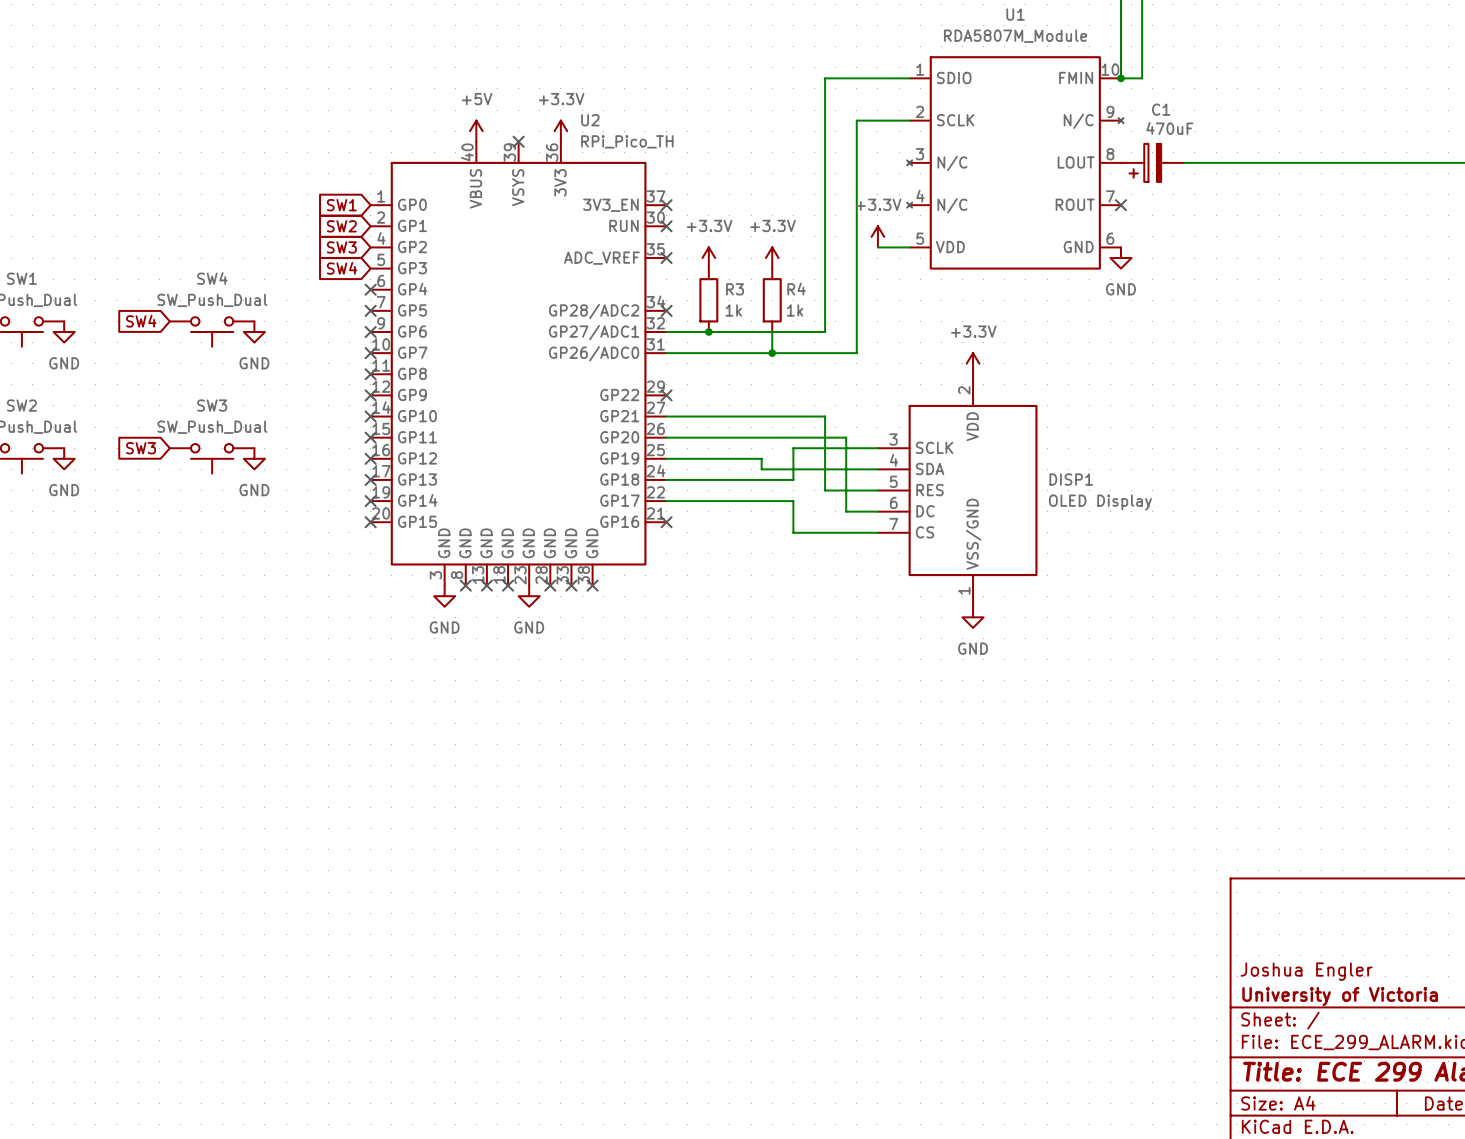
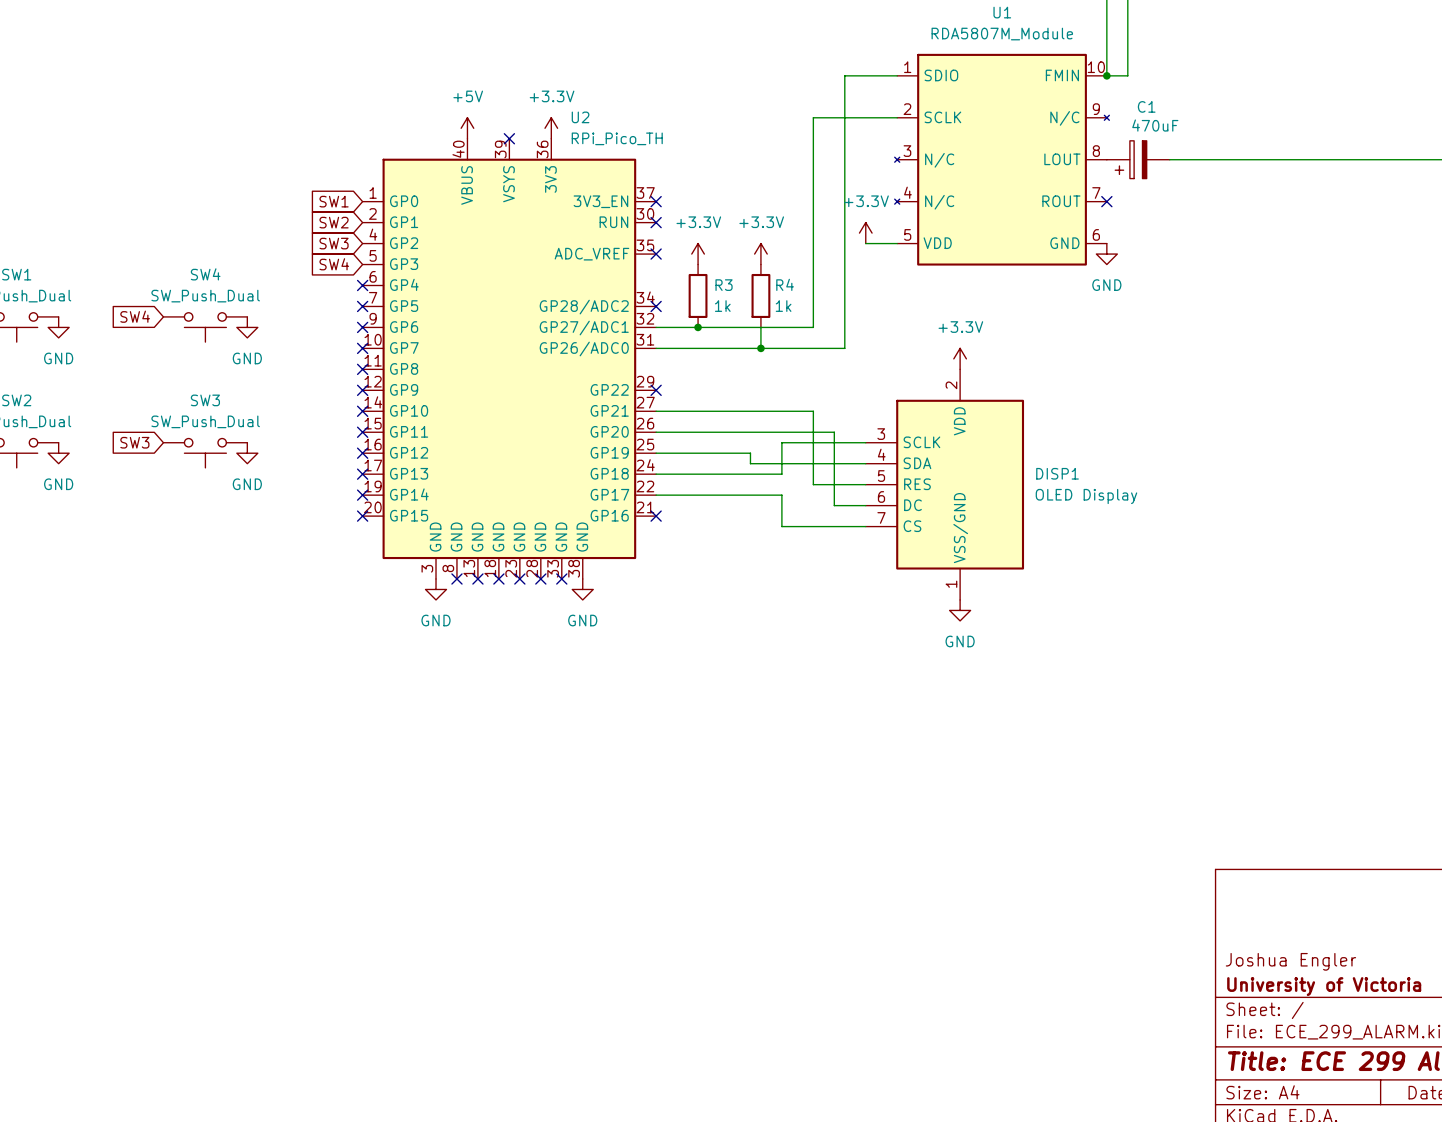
wire: (856, 78) (825, 78) (825, 120) -> (844, 75) (844, 117) (813, 117)
no-connect mark: none -> (519, 578)
no-connect mark: (592, 585) -> none
power symbol position: GND (529, 596) -> GND (582, 589)

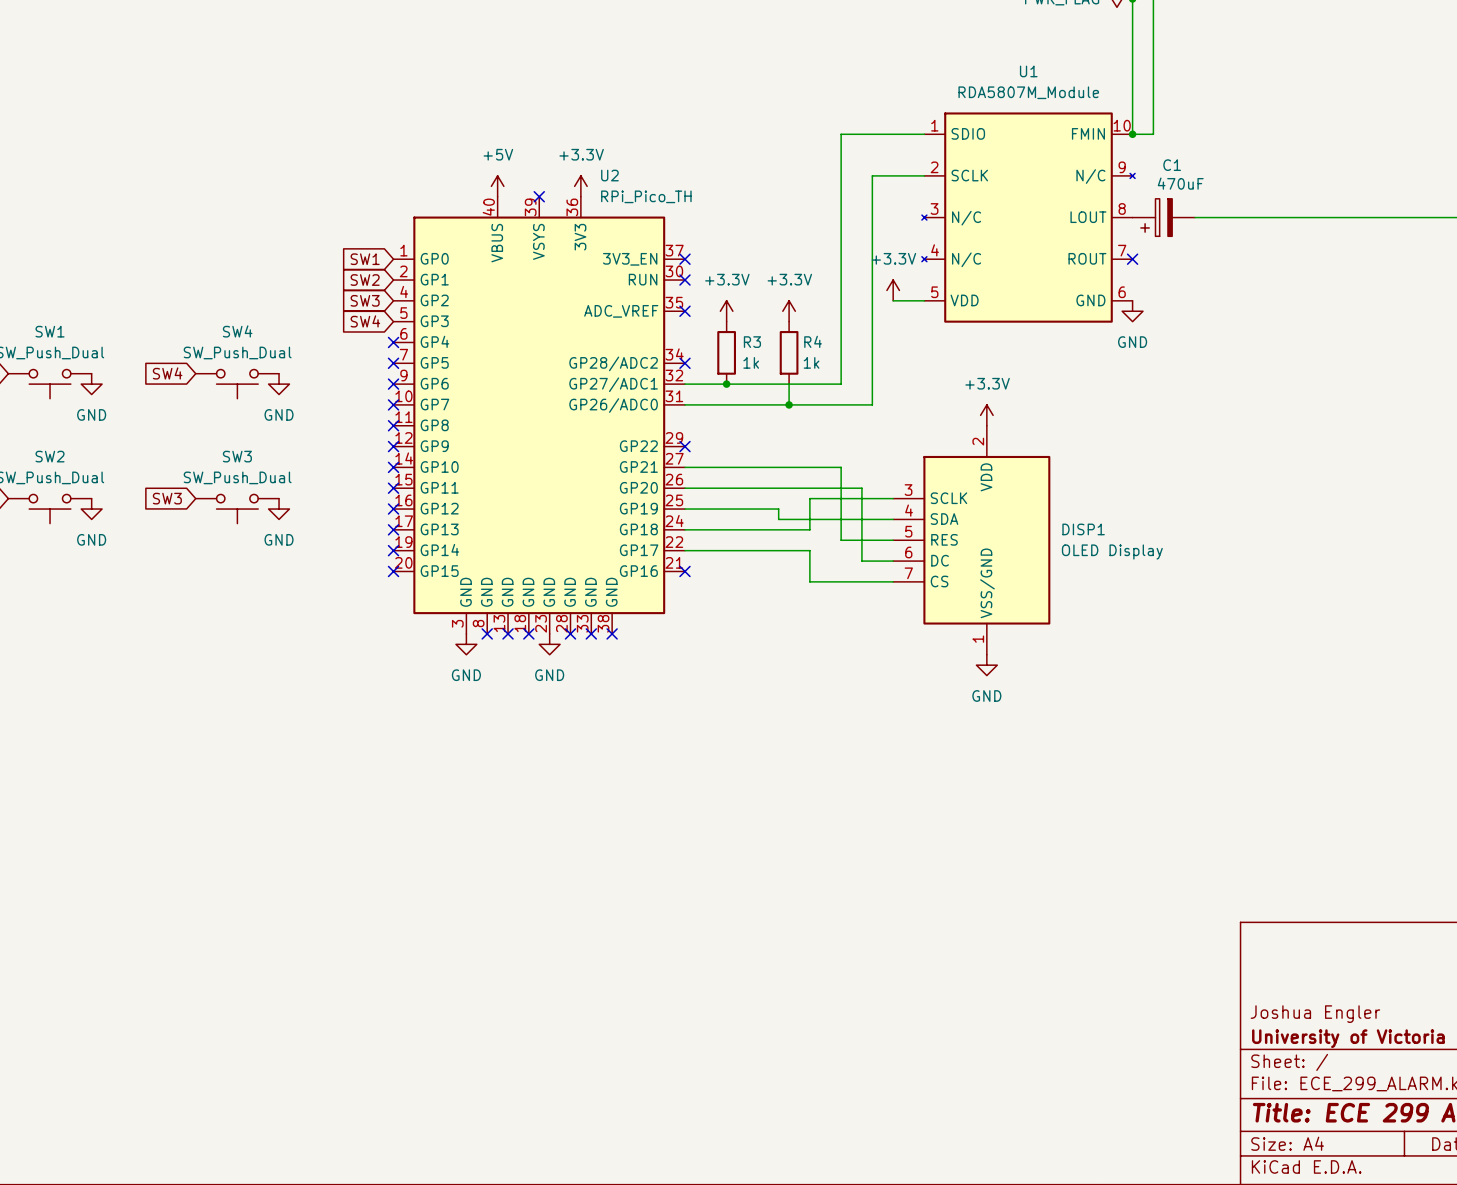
wire: (844, 75) (844, 117) (813, 117) -> (872, 134) (841, 134) (841, 175)
no-connect mark: (519, 578) -> none
no-connect mark: none -> (612, 633)
power symbol position: GND (582, 589) -> GND (549, 644)

